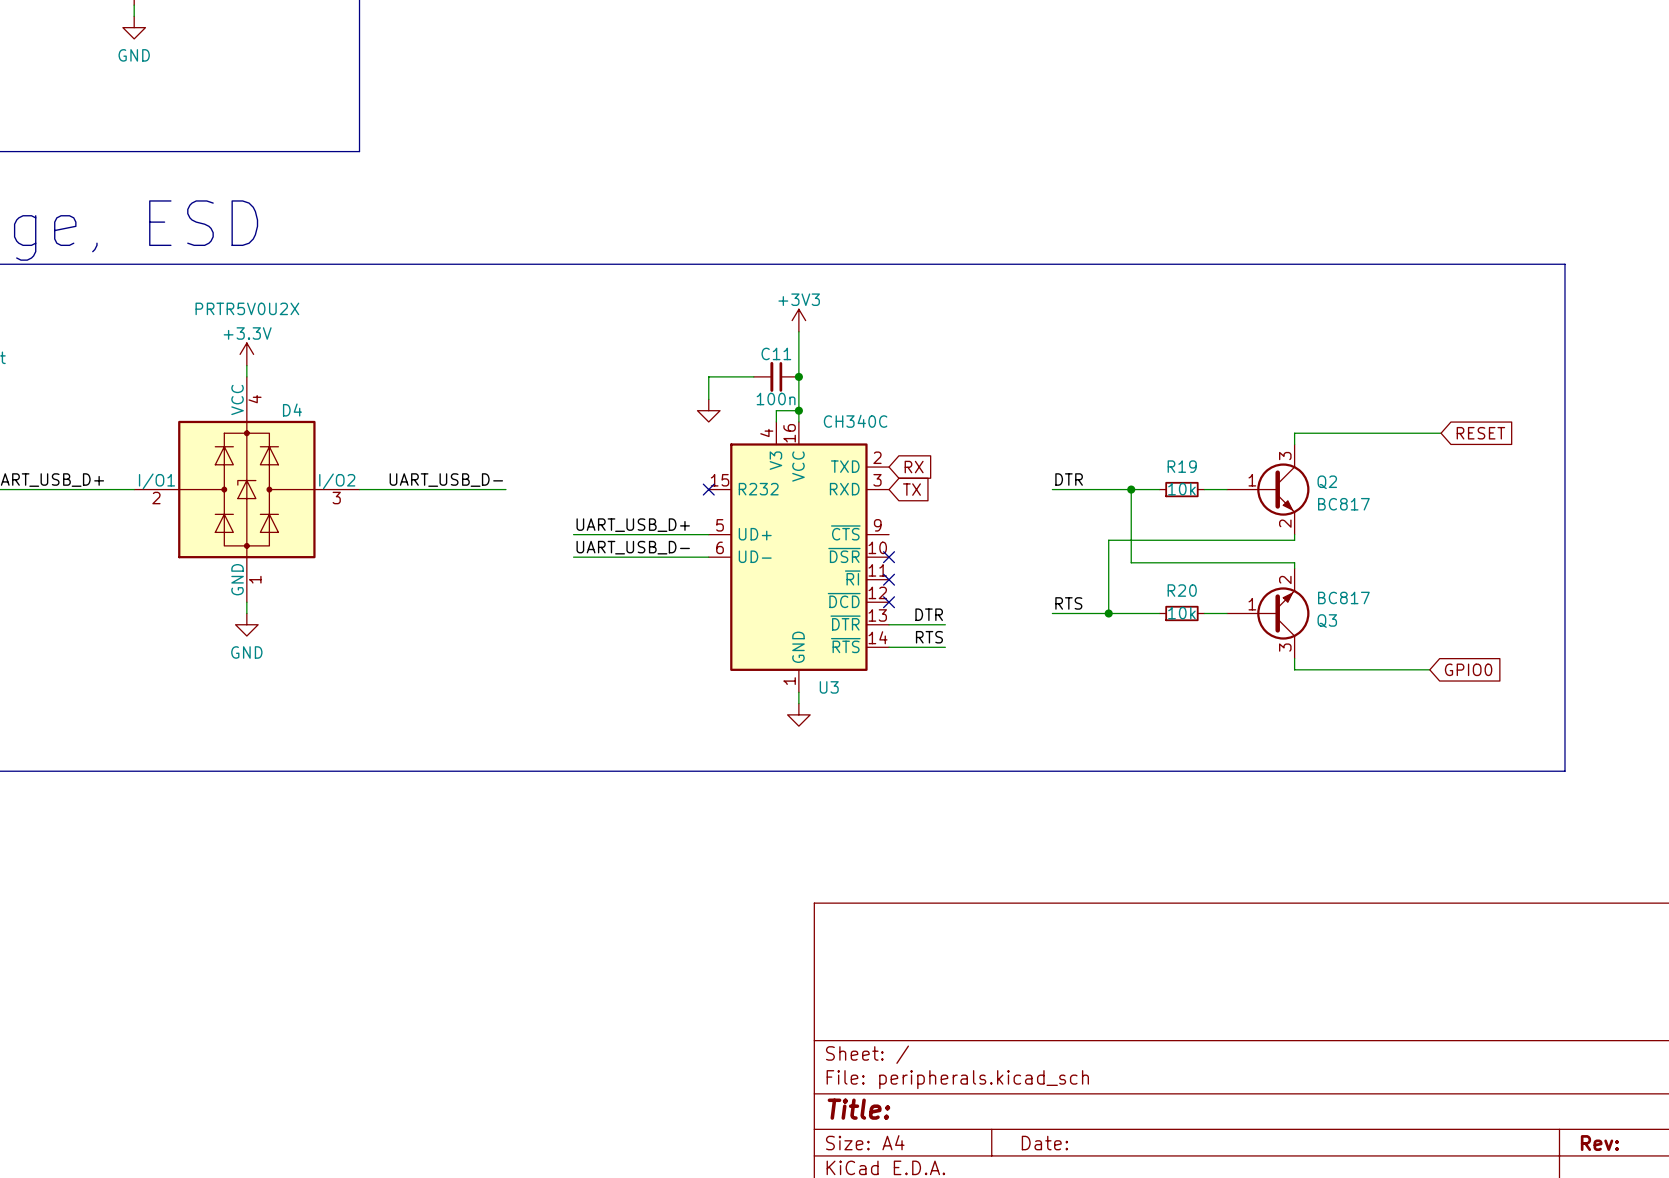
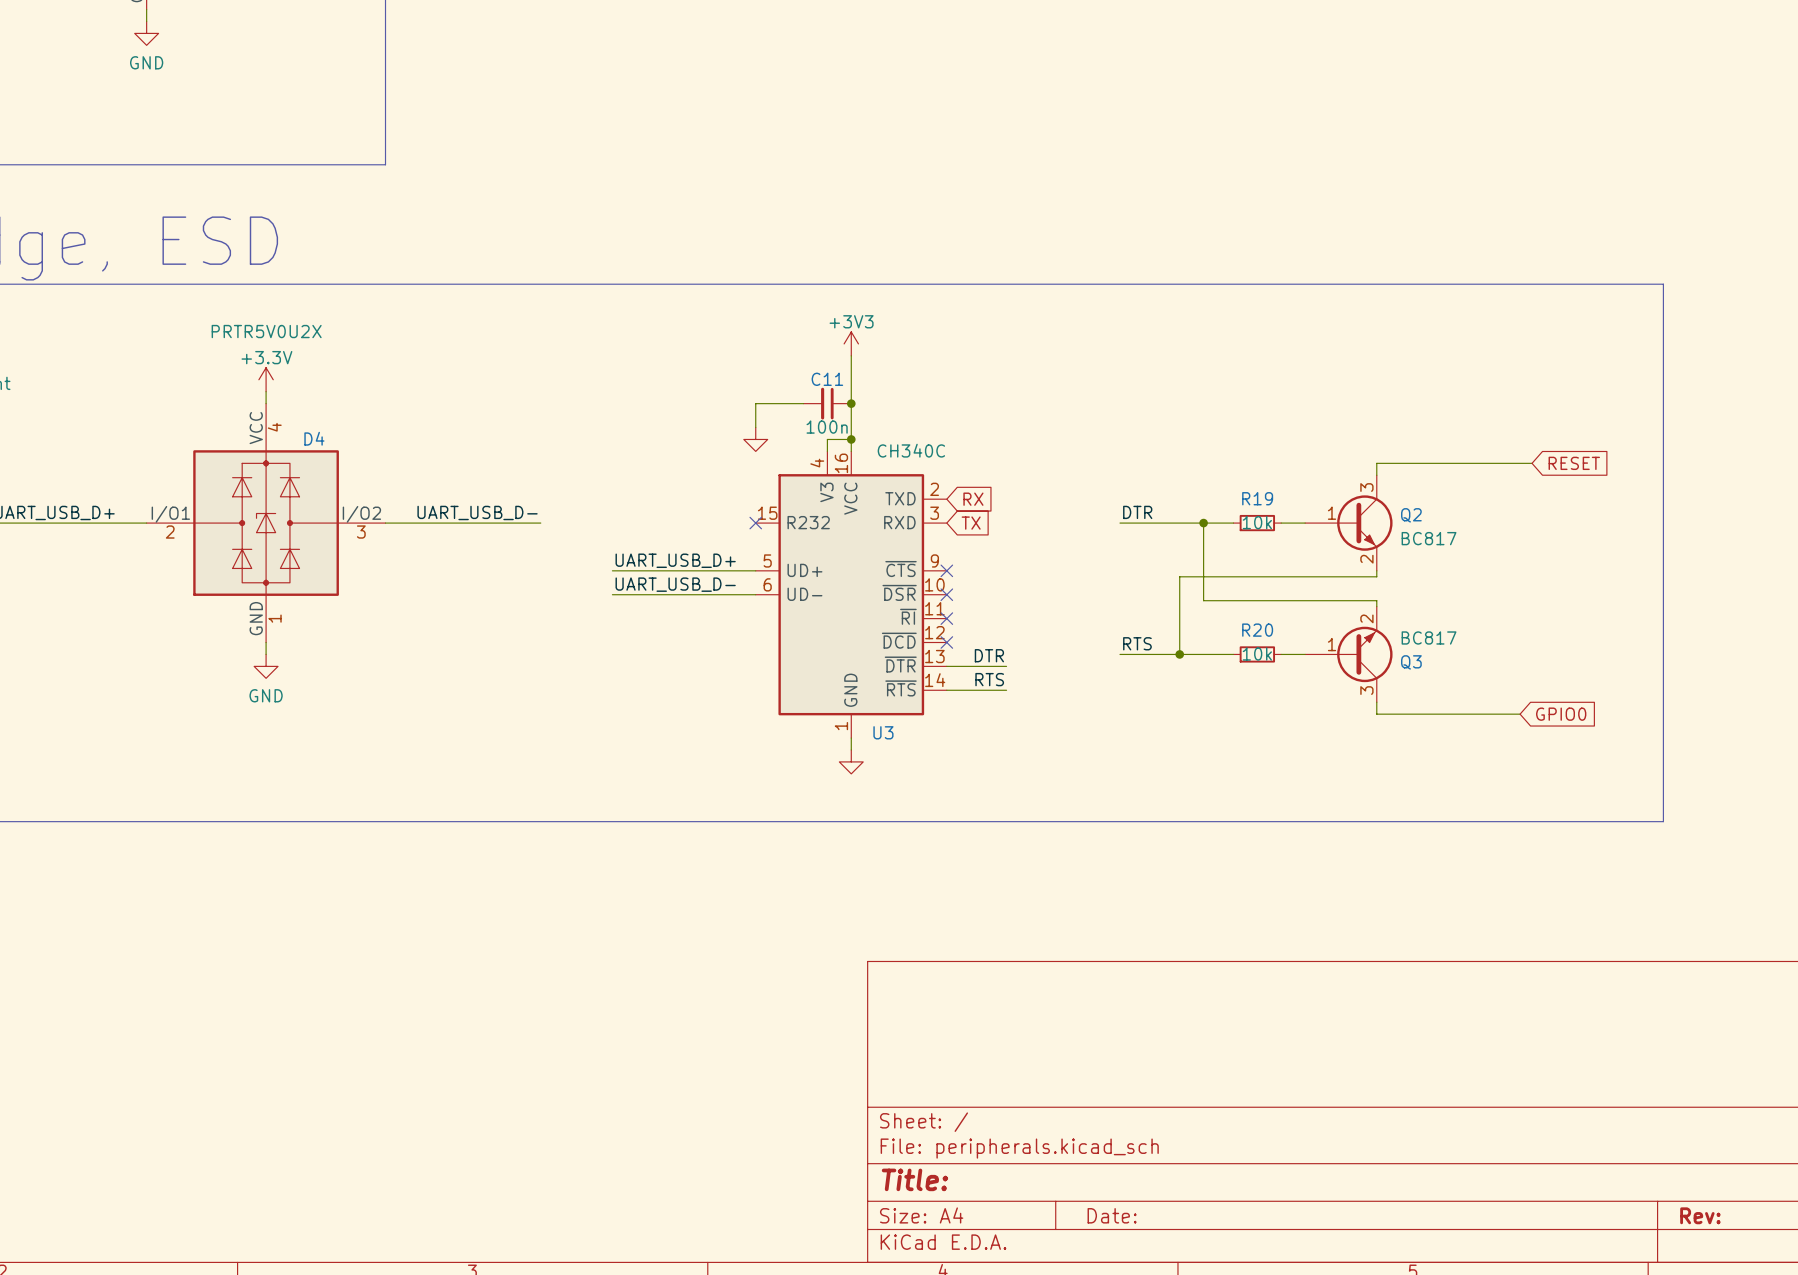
no-connect mark: none -> (946, 570)

